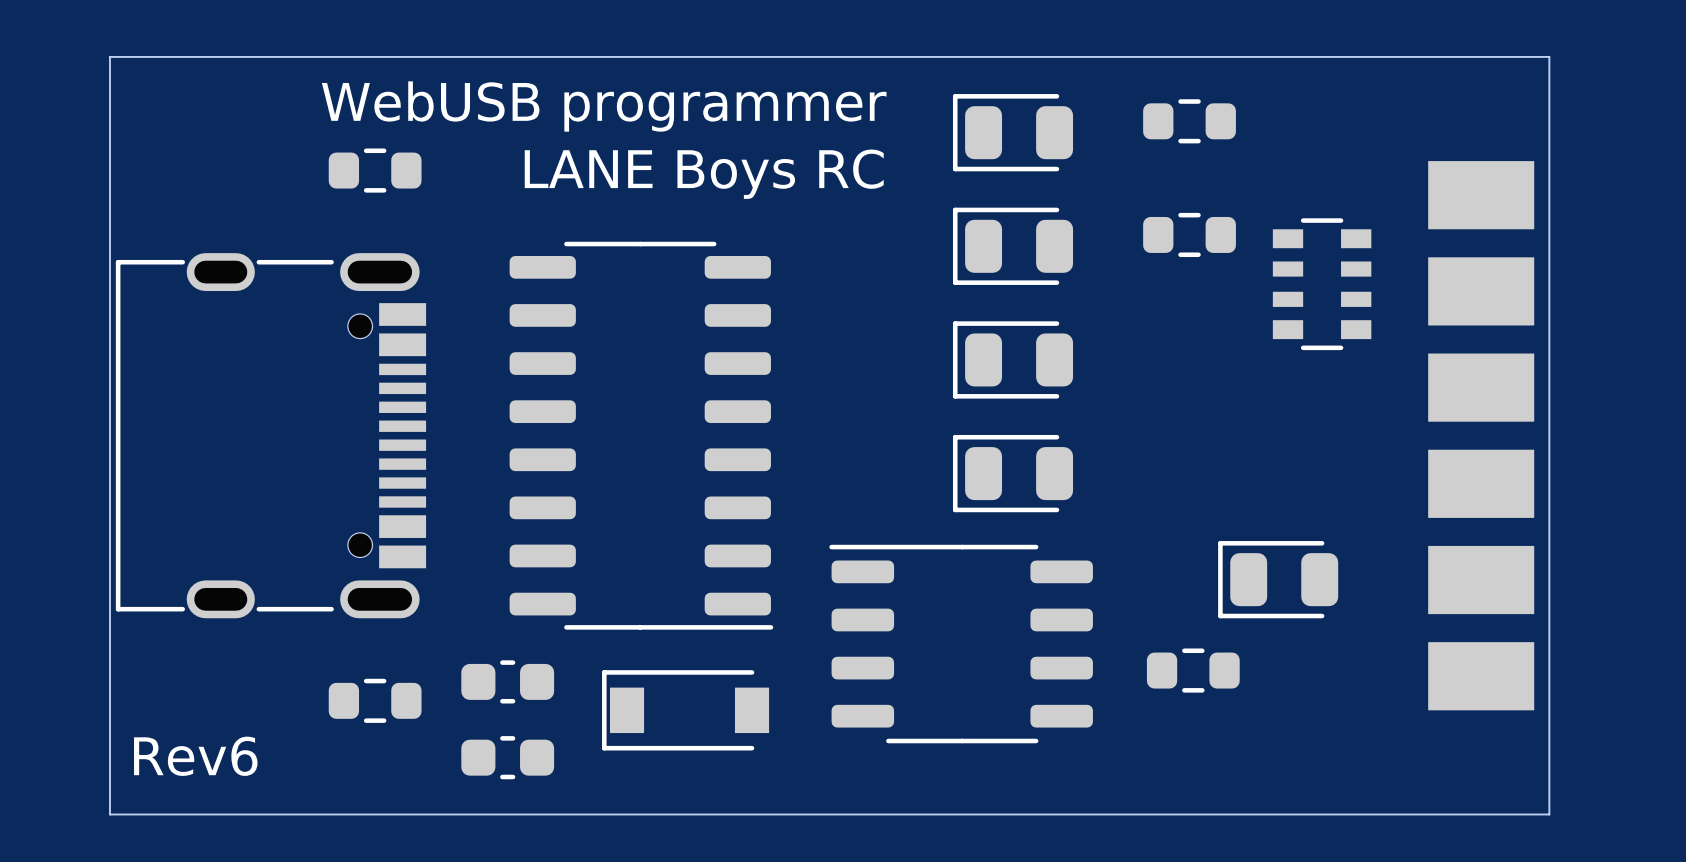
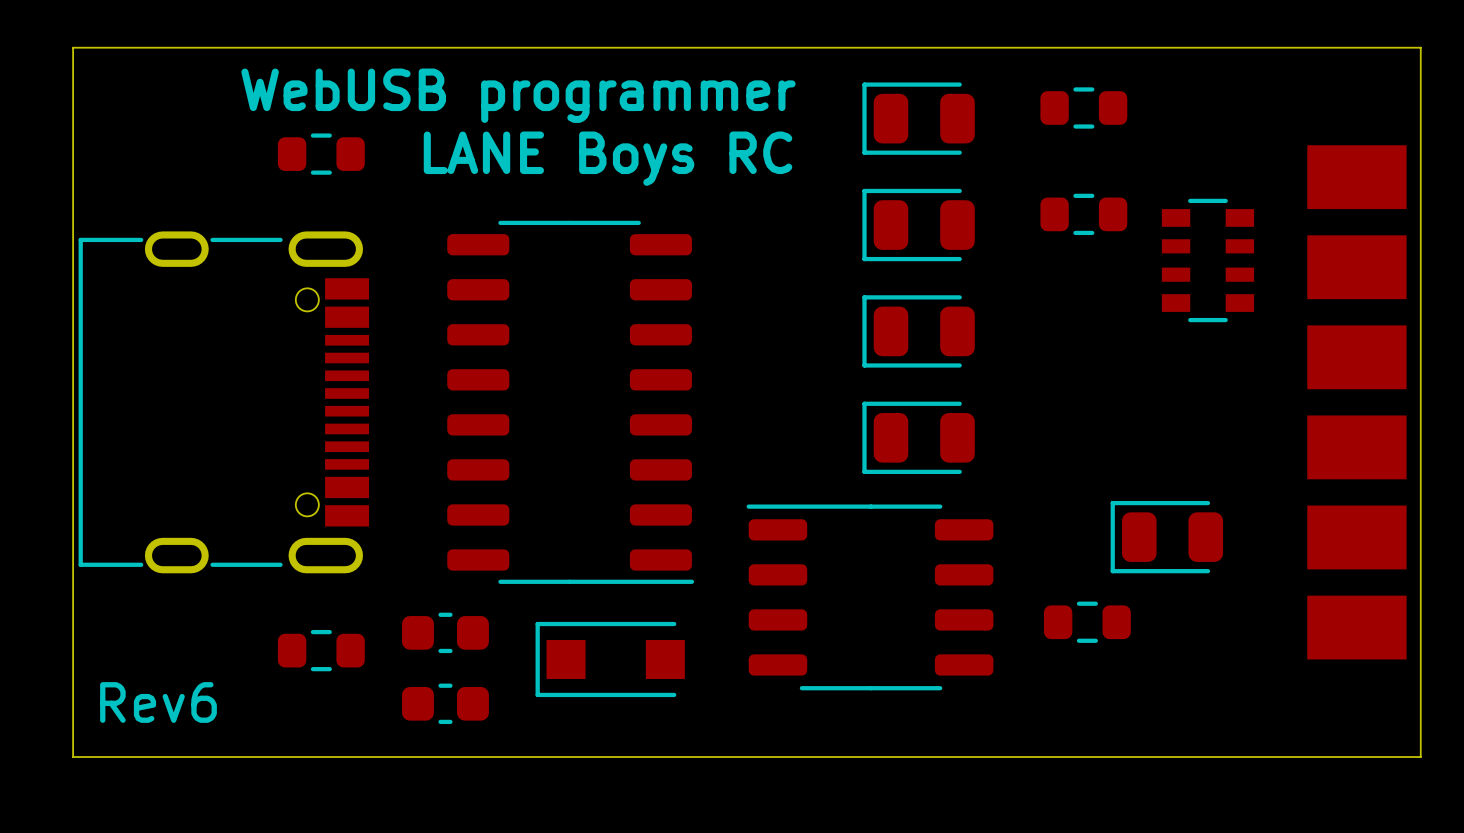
part footprint: [602, 670, 770, 751] -> [535, 621, 685, 698]

